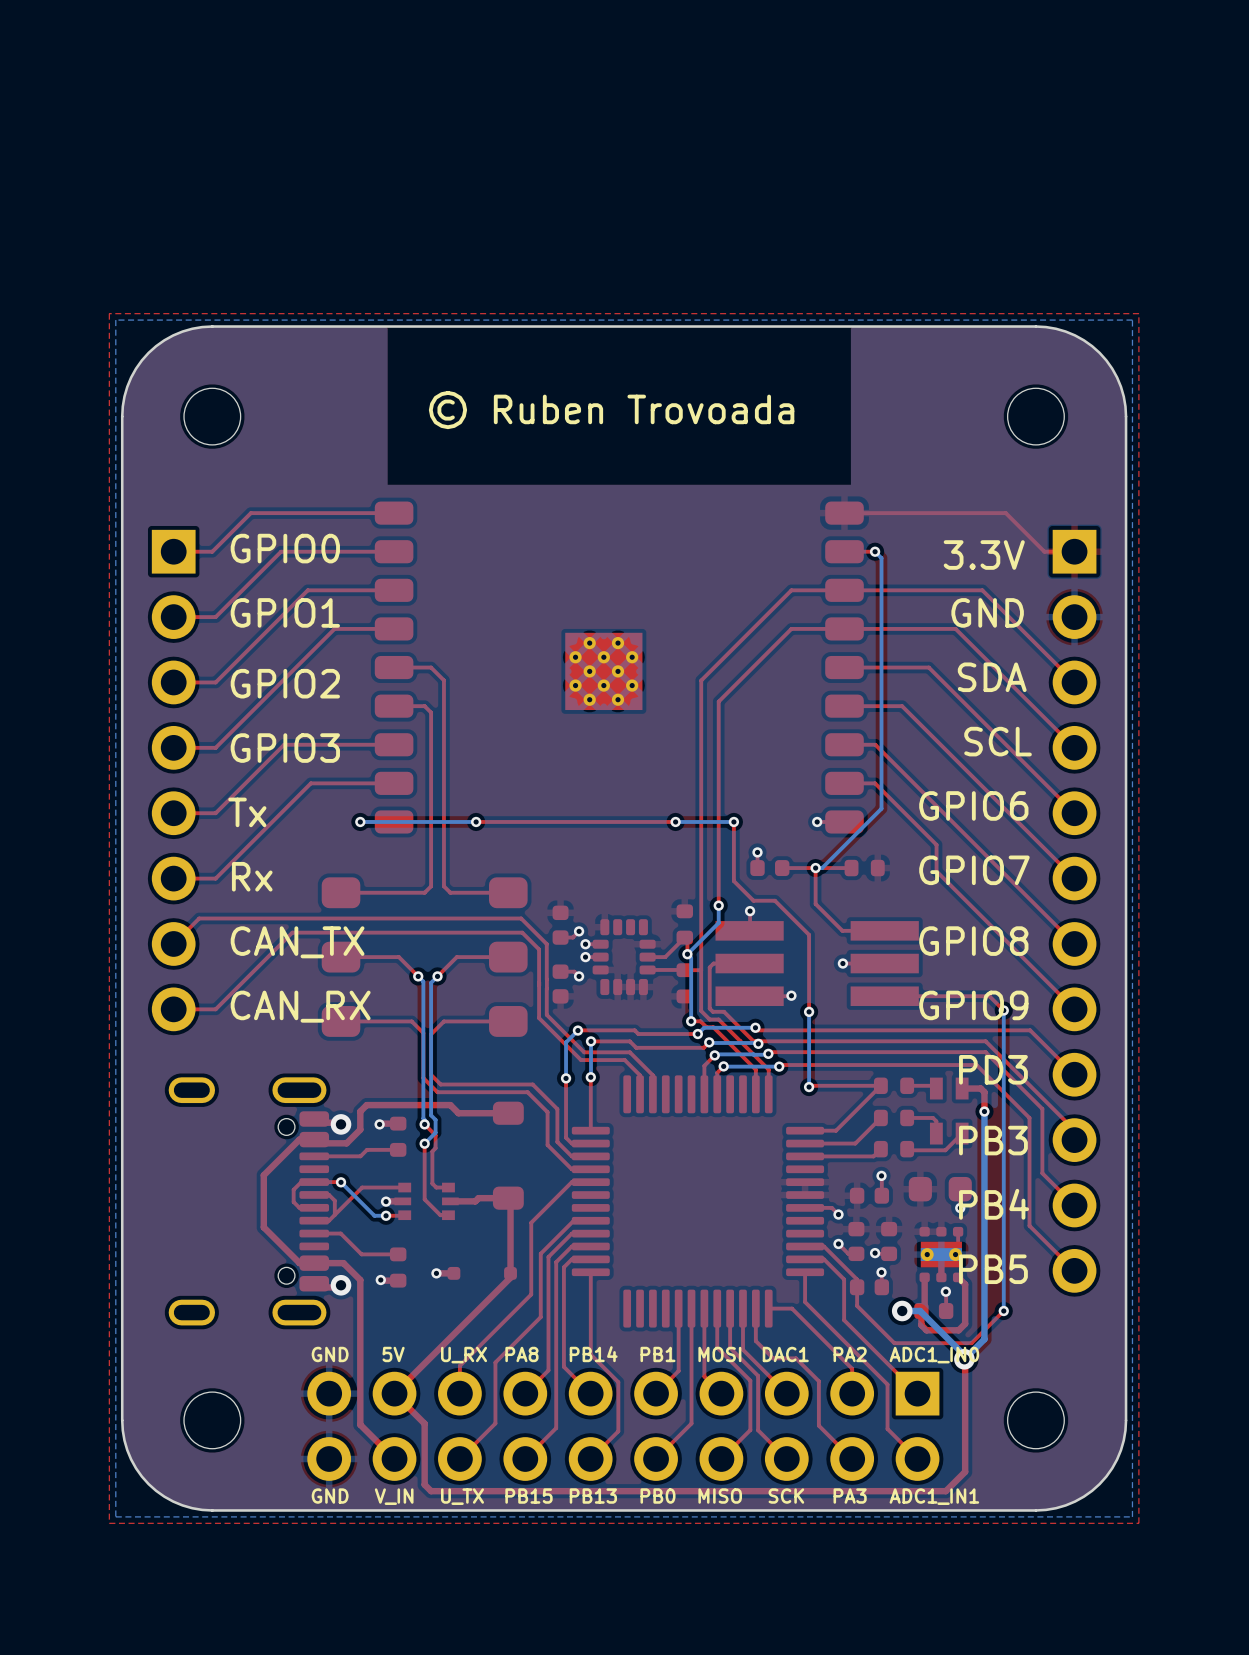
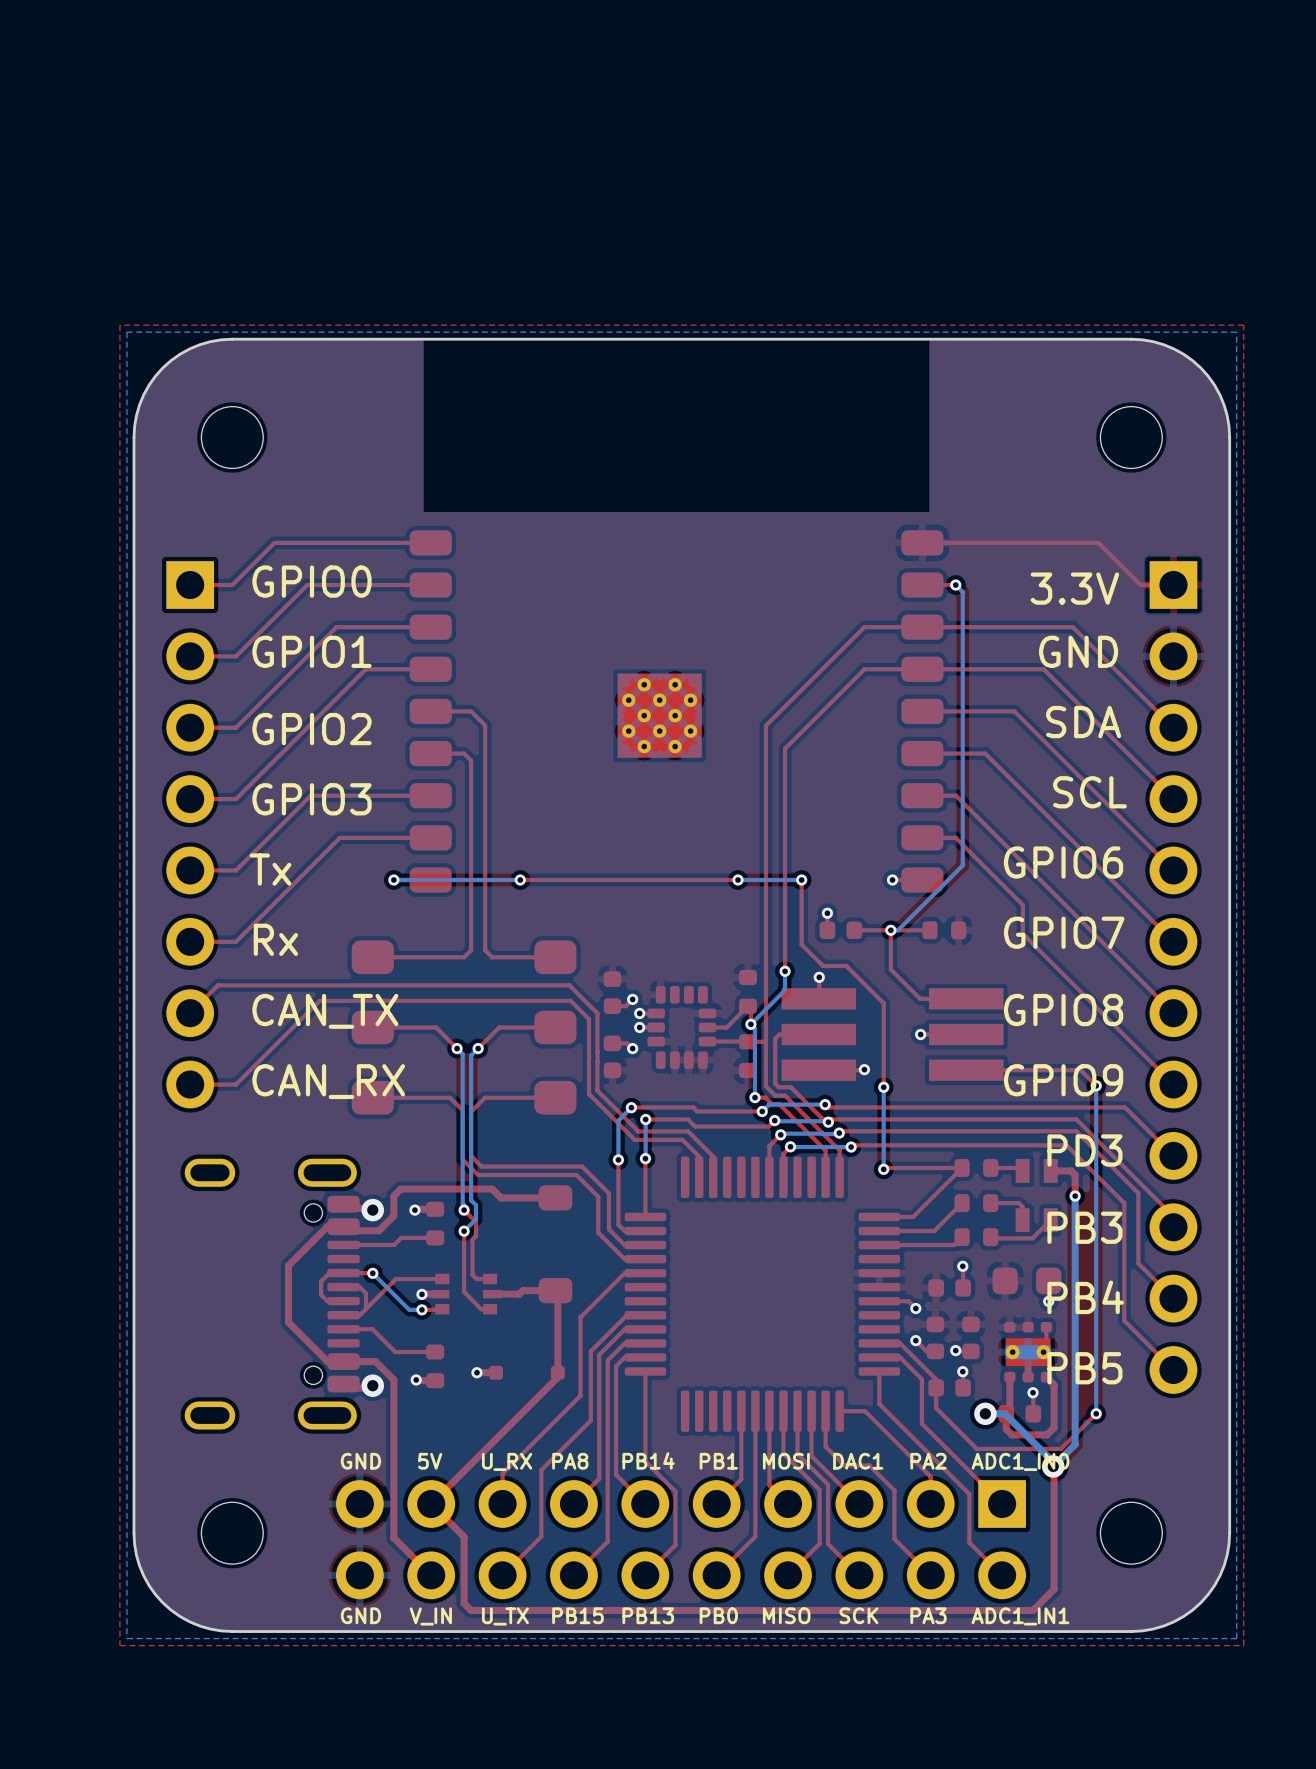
text: © Ruben Trovoada (611, 410) -> none

